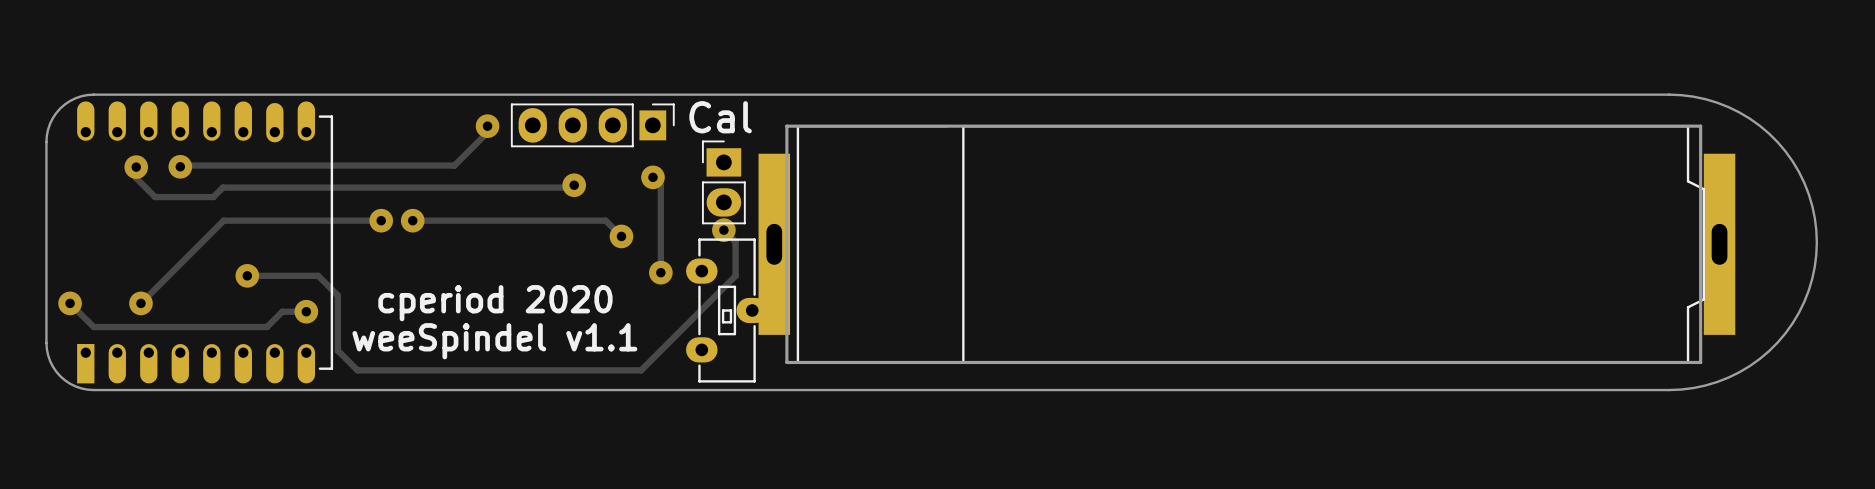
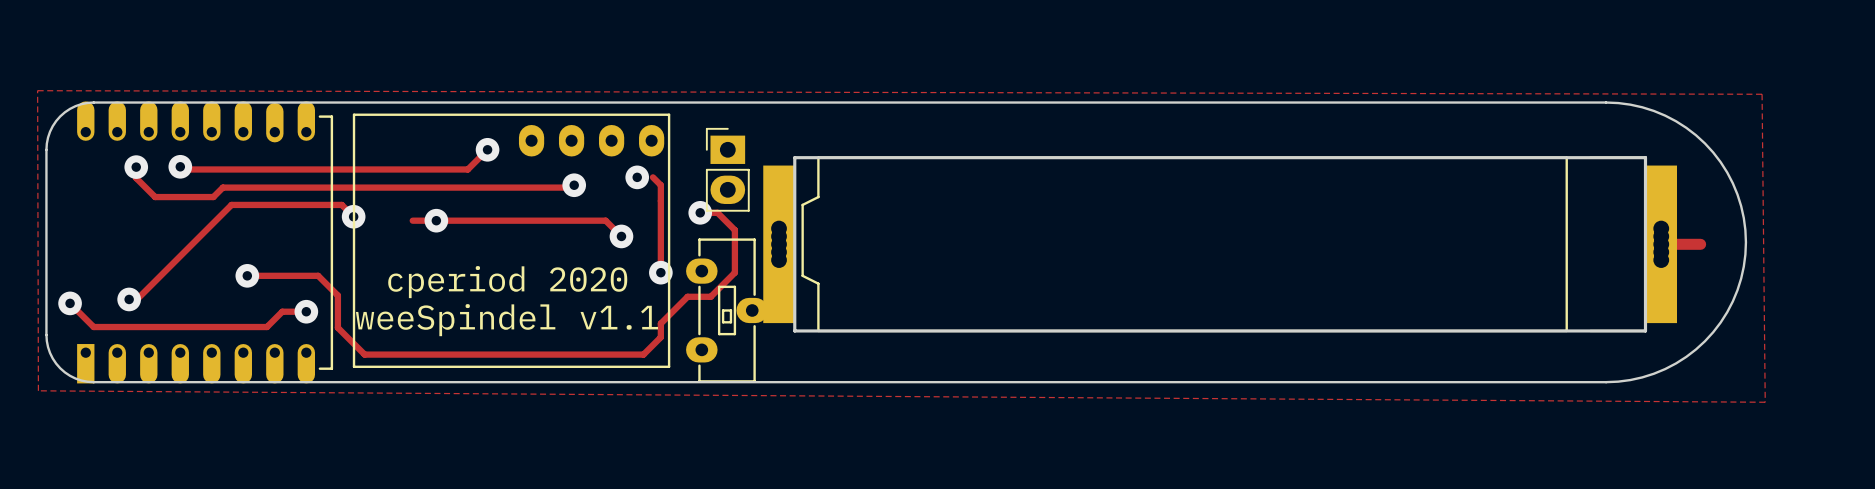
zone outline: none -> (37, 90) (38, 390) (1765, 402) (1762, 94) (37, 90)
text: Cal (720, 117) -> none
part: (592, 125) -> none
track: (487, 126) (487, 132) (454, 165) (180, 166) -> (487, 149) (467, 169) (183, 169) (180, 166)
via position: (487, 126) -> (487, 149)
board edge: (786, 126) (786, 362) (1700, 362) (1700, 126) (786, 126) -> (794, 157) (794, 330) (1645, 330) (1645, 157) (794, 157)
board edge: (46, 149) (48, 129) (56, 113) (64, 104) (75, 98) (93, 94) (1681, 95) (1717, 102) (1739, 112) (1759, 125) (1777, 142) (1799, 172) (1808, 194) (1814, 218) (1816, 242) (1814, 266) (1808, 290) (1799, 312) (1777, 342) (1759, 358) (1739, 372) (1717, 382) (1681, 389) (93, 390) (75, 386) (64, 380) (56, 371) (48, 355) (46, 334) -> (46, 149) (50, 131) (60, 116) (75, 106) (93, 102) (1618, 103) (1642, 107) (1665, 115) (1686, 127) (1704, 143) (1720, 162) (1732, 183) (1741, 206) (1745, 242) (1741, 278) (1732, 301) (1720, 322) (1704, 341) (1686, 356) (1665, 369) (1642, 377) (1618, 381) (93, 382) (75, 378) (60, 368) (50, 352) (46, 334)
via position: (652, 177) -> (637, 177)
part position: (723, 182) -> (727, 169)
track: none -> (353, 216) (341, 204) (231, 204) (137, 299) (129, 299)
via: none -> (353, 216)
track: (381, 220) (223, 220) (140, 303) -> none
via: (381, 220) -> none
via position: (412, 220) -> (436, 220)
track: (723, 230) (735, 241) (735, 275) (641, 370) (357, 370) (337, 350) (337, 327) -> (700, 212) (717, 212) (734, 230) (734, 272) (710, 296) (687, 296) (660, 323) (660, 337) (643, 354) (364, 354) (337, 327)
via position: (723, 230) -> (700, 212)
part: none -> (511, 240)
part: none -> (1220, 244)
part: (1246, 244) -> none
track: none -> (1661, 244) (1700, 244)
via position: (140, 303) -> (129, 299)
text position: cperiod 2020 (495, 303) -> cperiod 2020 (507, 282)
text position: weeSpindel v1.1 (494, 341) -> weeSpindel v1.1 (506, 320)

